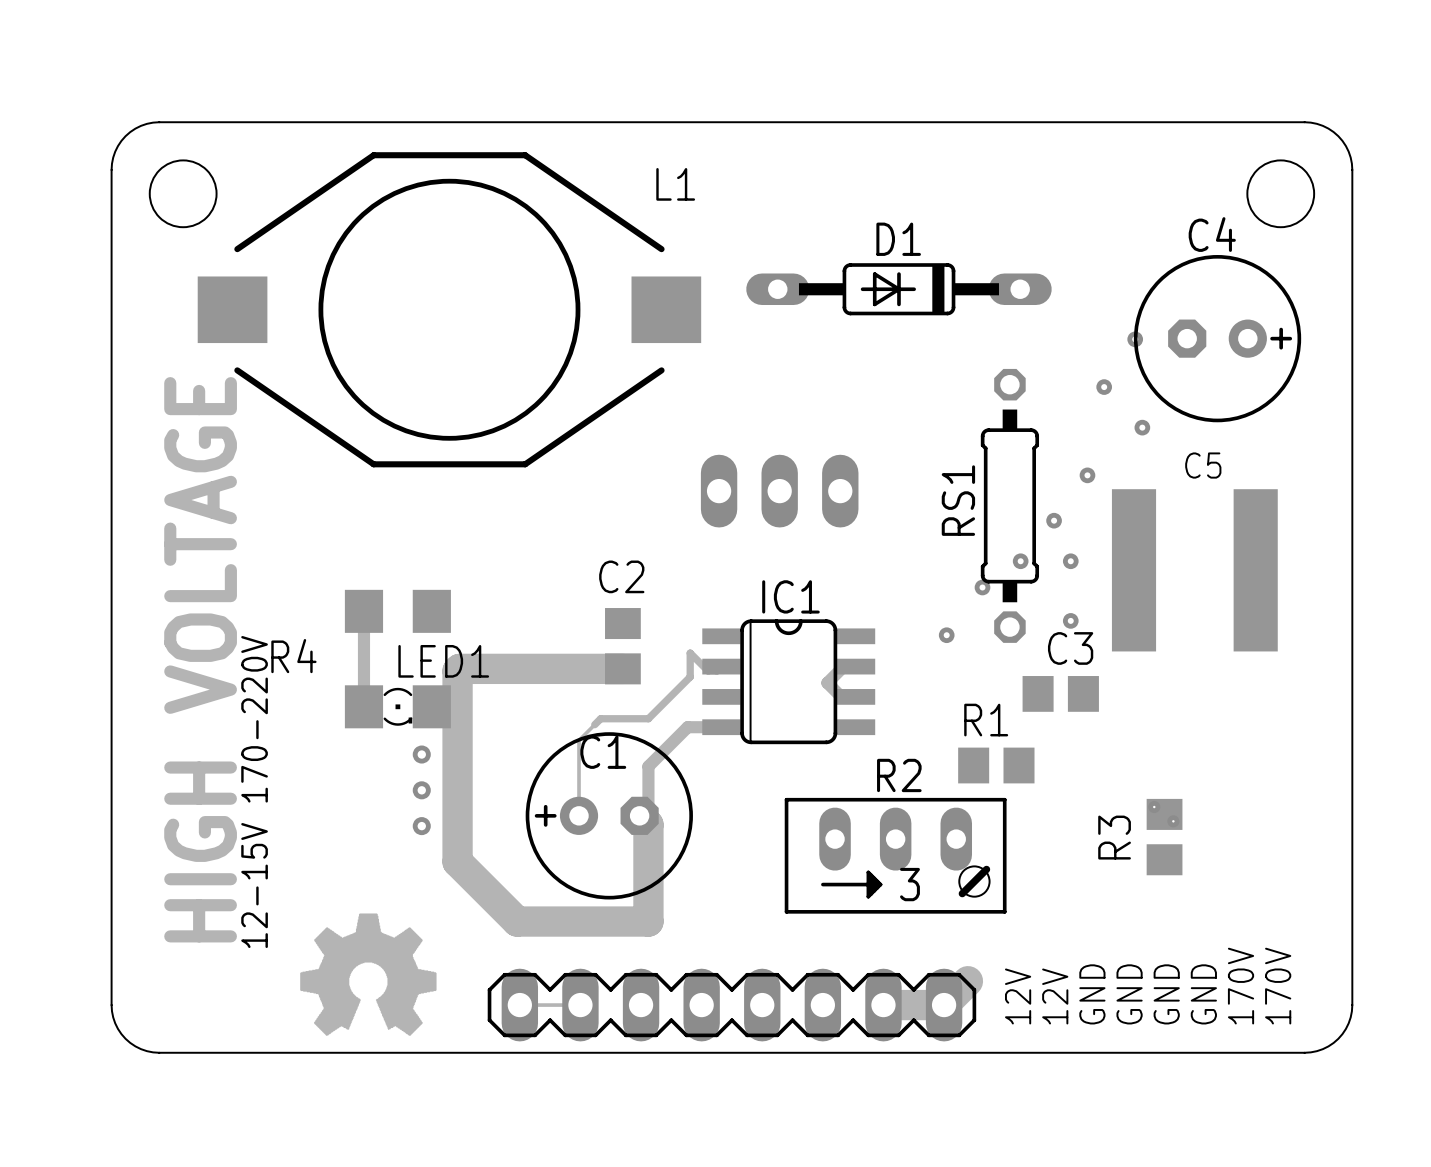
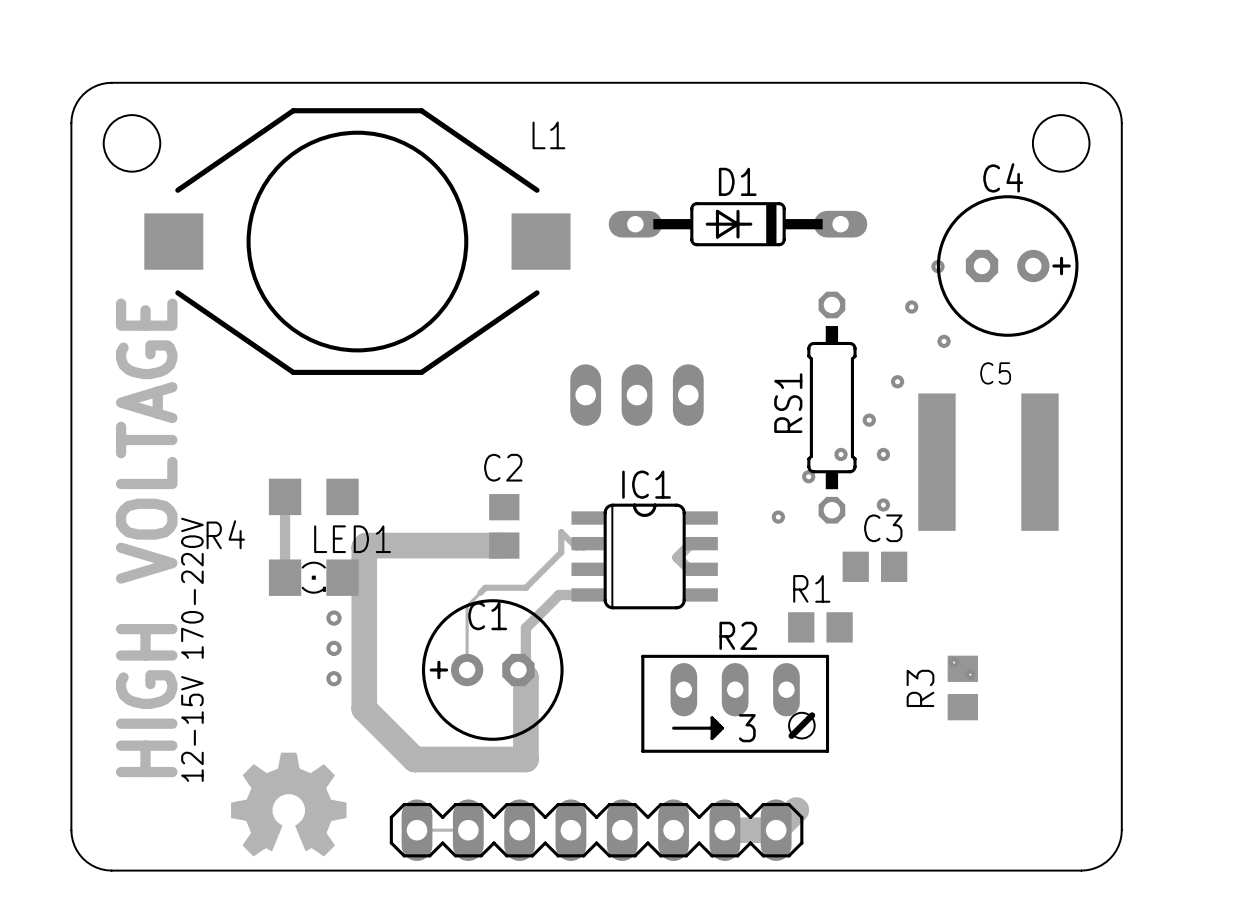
text: 170V (1241, 986) -> none
text: 170V (1278, 986) -> none
text: GND (1092, 994) -> none
text: GND (1129, 994) -> none
text: GND (1166, 994) -> none
text: GND (1203, 994) -> none
text: 12V (1018, 996) -> none
text: 12V (1055, 996) -> none

